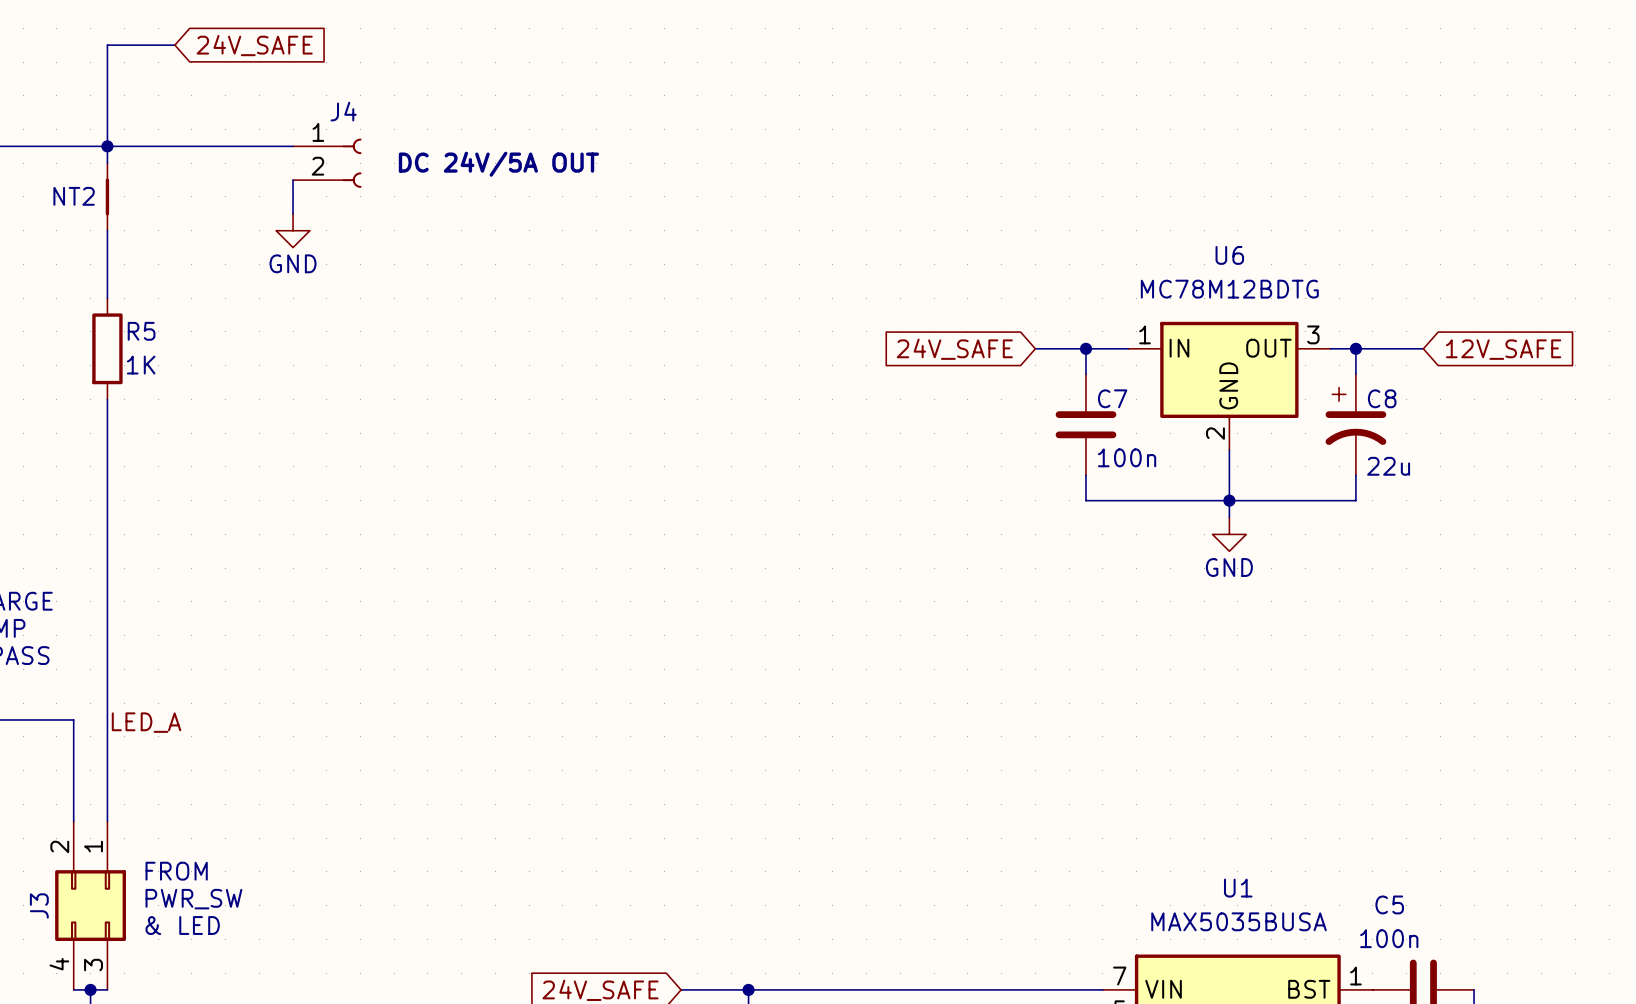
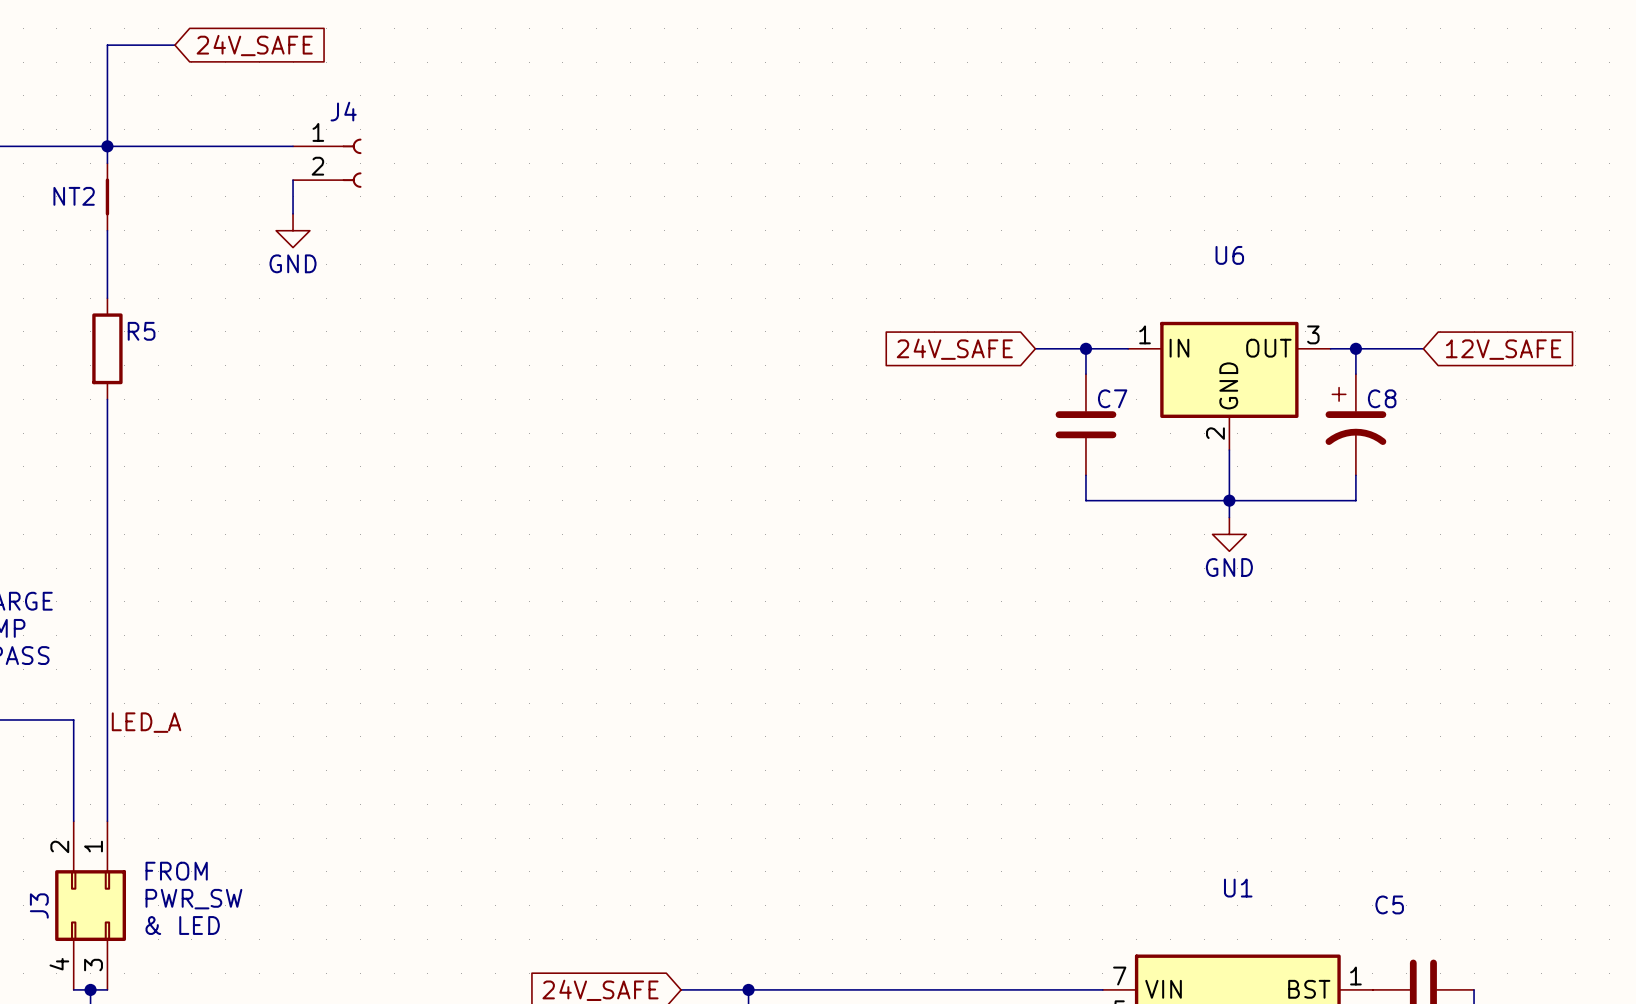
J4 value: DC 24V/5A OUT (498, 164) -> none
U6 value: MC78M12BDTG (1229, 289) -> none
R5 value: 1K (141, 365) -> none
C7 value: 100n (1127, 457) -> none
C8 value: 22u (1388, 466) -> none
U1 value: MAX5035BUSA (1239, 921) -> none
C5 value: 100n (1389, 938) -> none

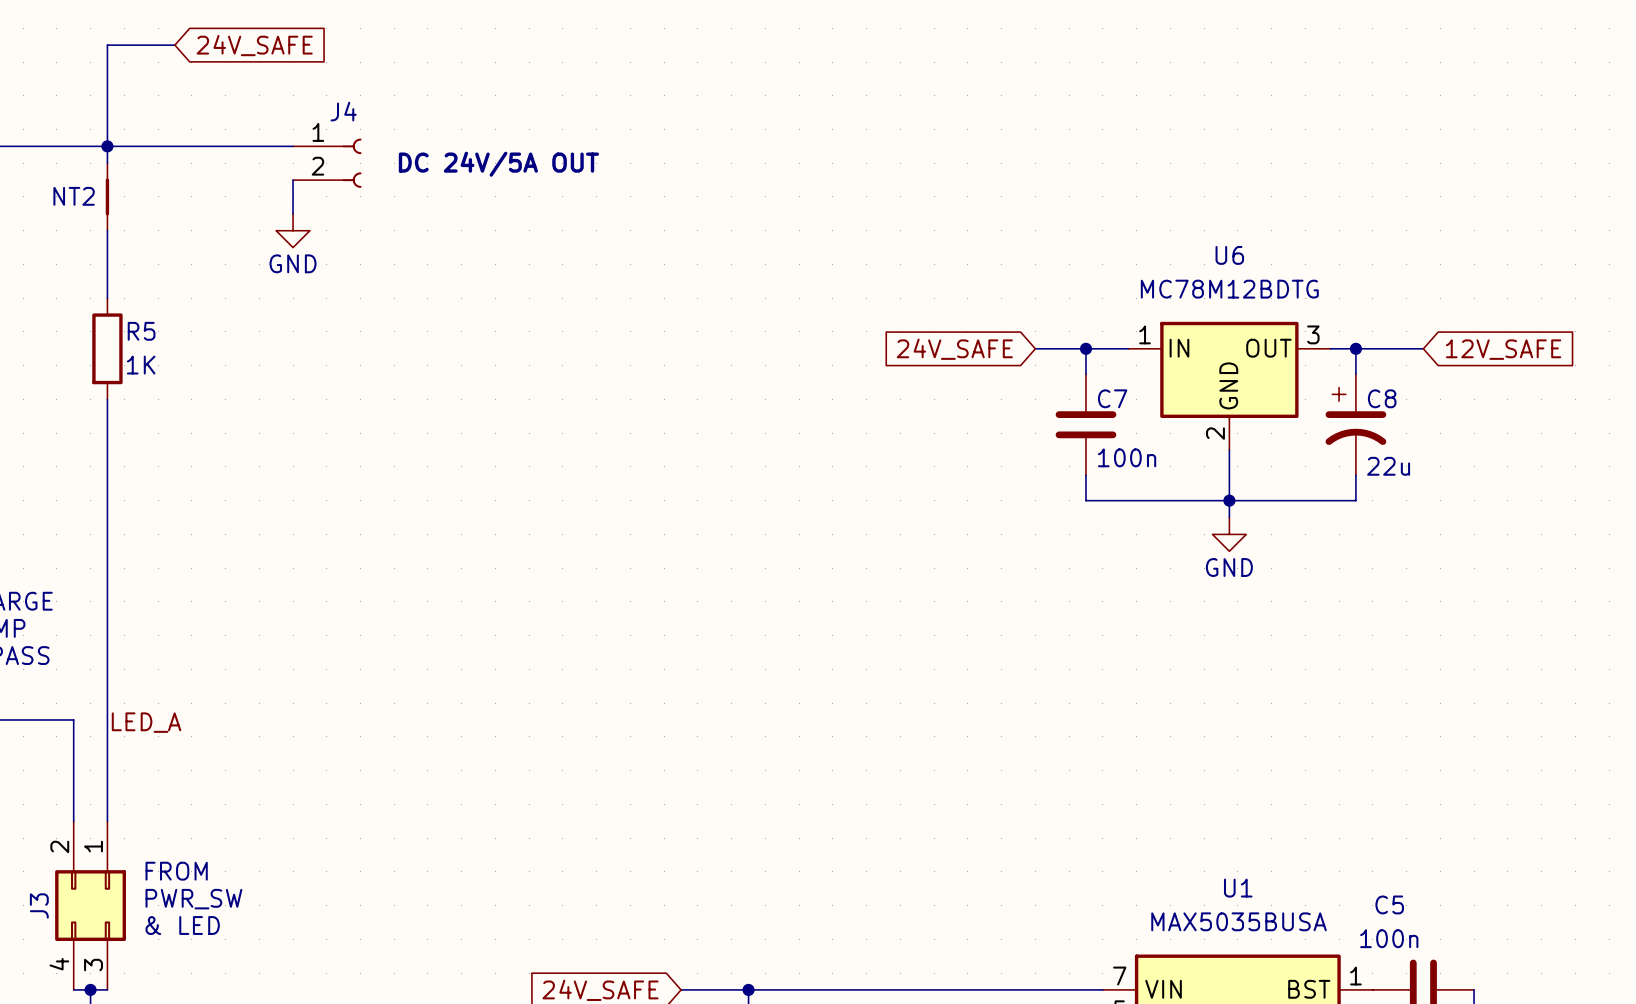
J4 value: none -> DC 24V/5A OUT (498, 164)
U6 value: none -> MC78M12BDTG (1229, 289)
R5 value: none -> 1K (141, 365)
C7 value: none -> 100n (1127, 457)
C8 value: none -> 22u (1388, 466)
U1 value: none -> MAX5035BUSA (1239, 921)
C5 value: none -> 100n (1389, 938)

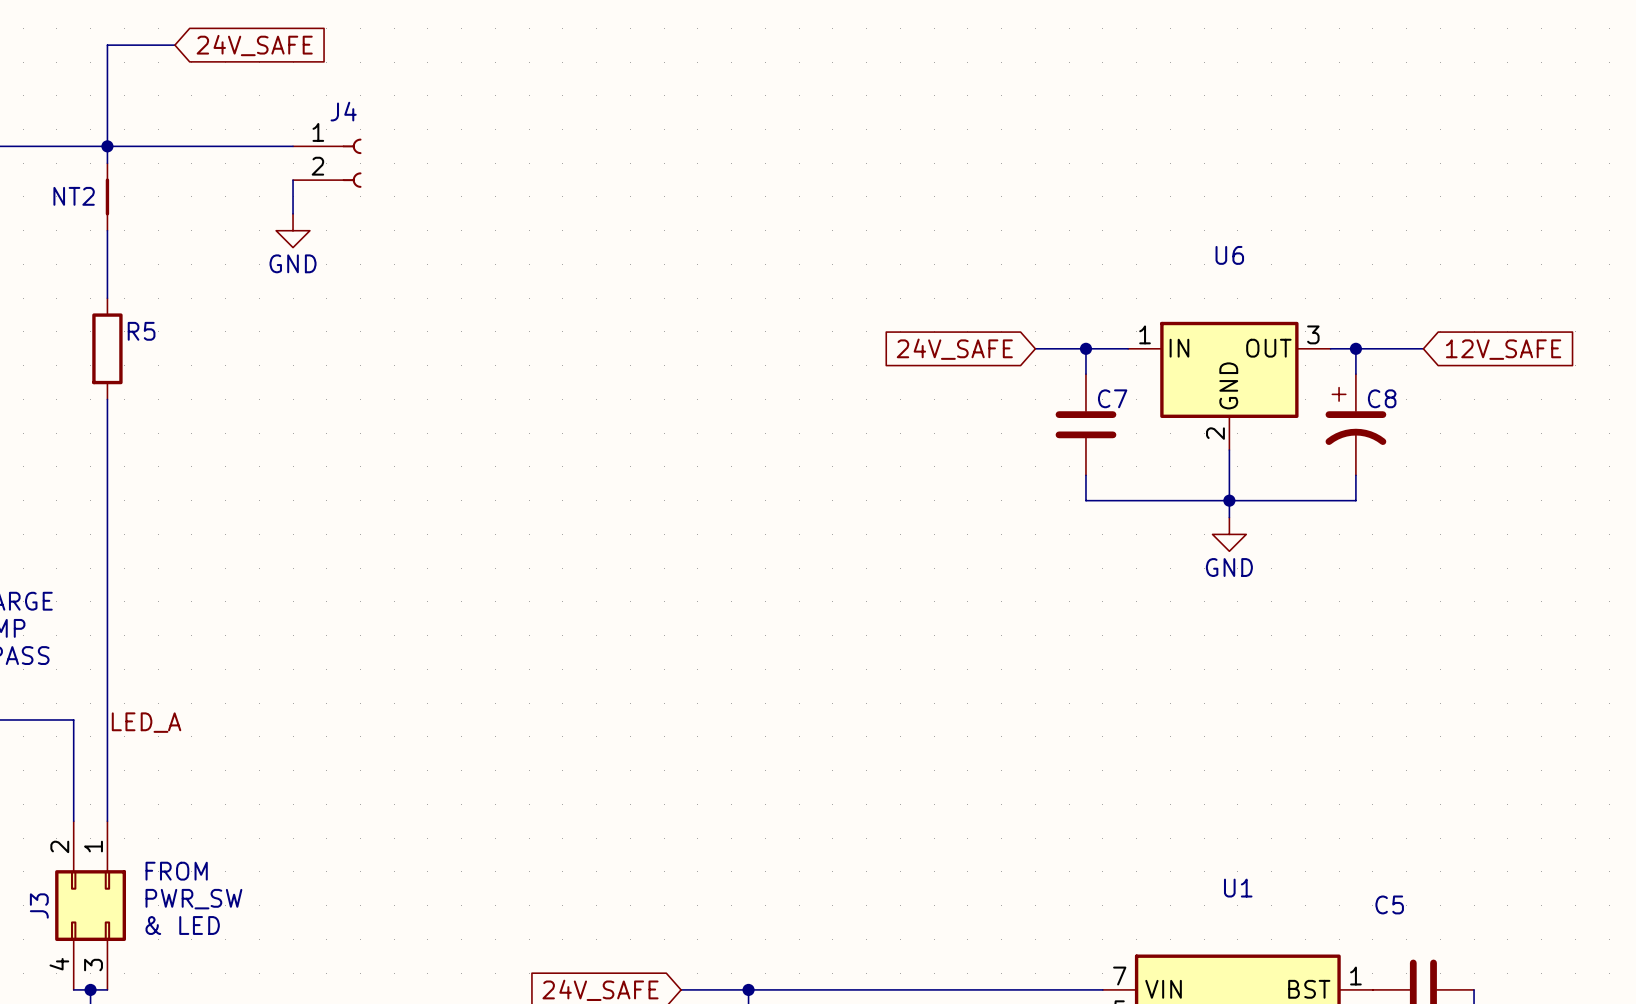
J4 value: DC 24V/5A OUT (498, 164) -> none
U6 value: MC78M12BDTG (1229, 289) -> none
R5 value: 1K (141, 365) -> none
C7 value: 100n (1127, 457) -> none
C8 value: 22u (1388, 466) -> none
U1 value: MAX5035BUSA (1239, 921) -> none
C5 value: 100n (1389, 938) -> none

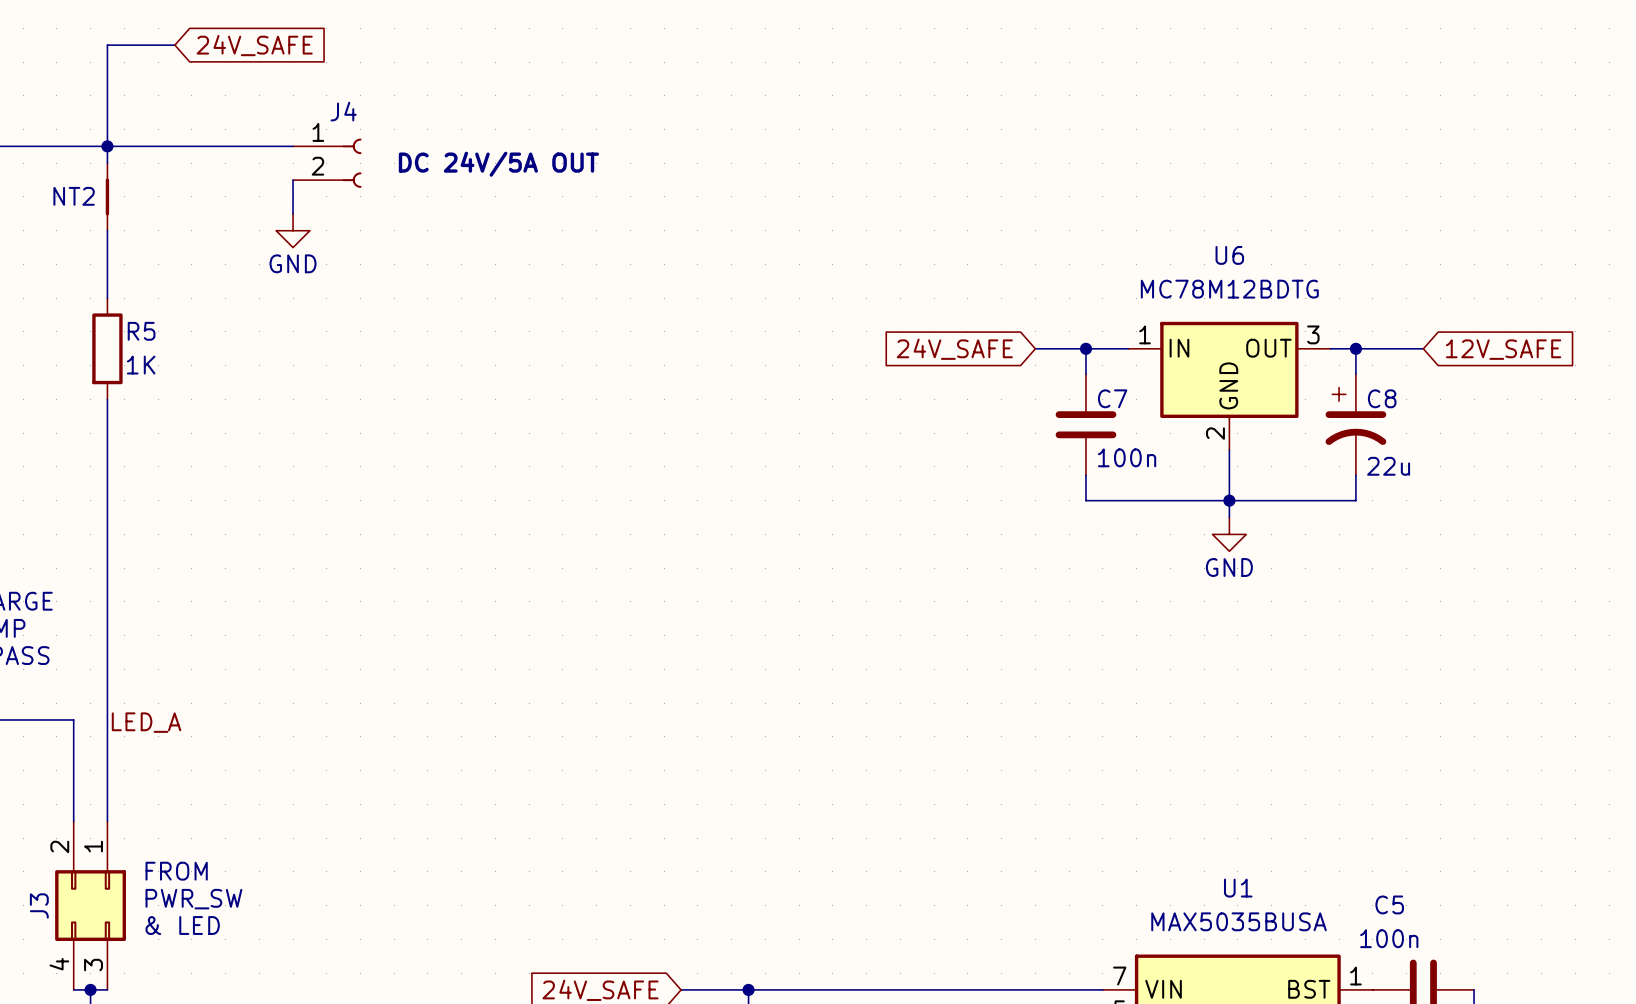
J4 value: none -> DC 24V/5A OUT (498, 164)
U6 value: none -> MC78M12BDTG (1229, 289)
R5 value: none -> 1K (141, 365)
C7 value: none -> 100n (1127, 457)
C8 value: none -> 22u (1388, 466)
U1 value: none -> MAX5035BUSA (1239, 921)
C5 value: none -> 100n (1389, 938)

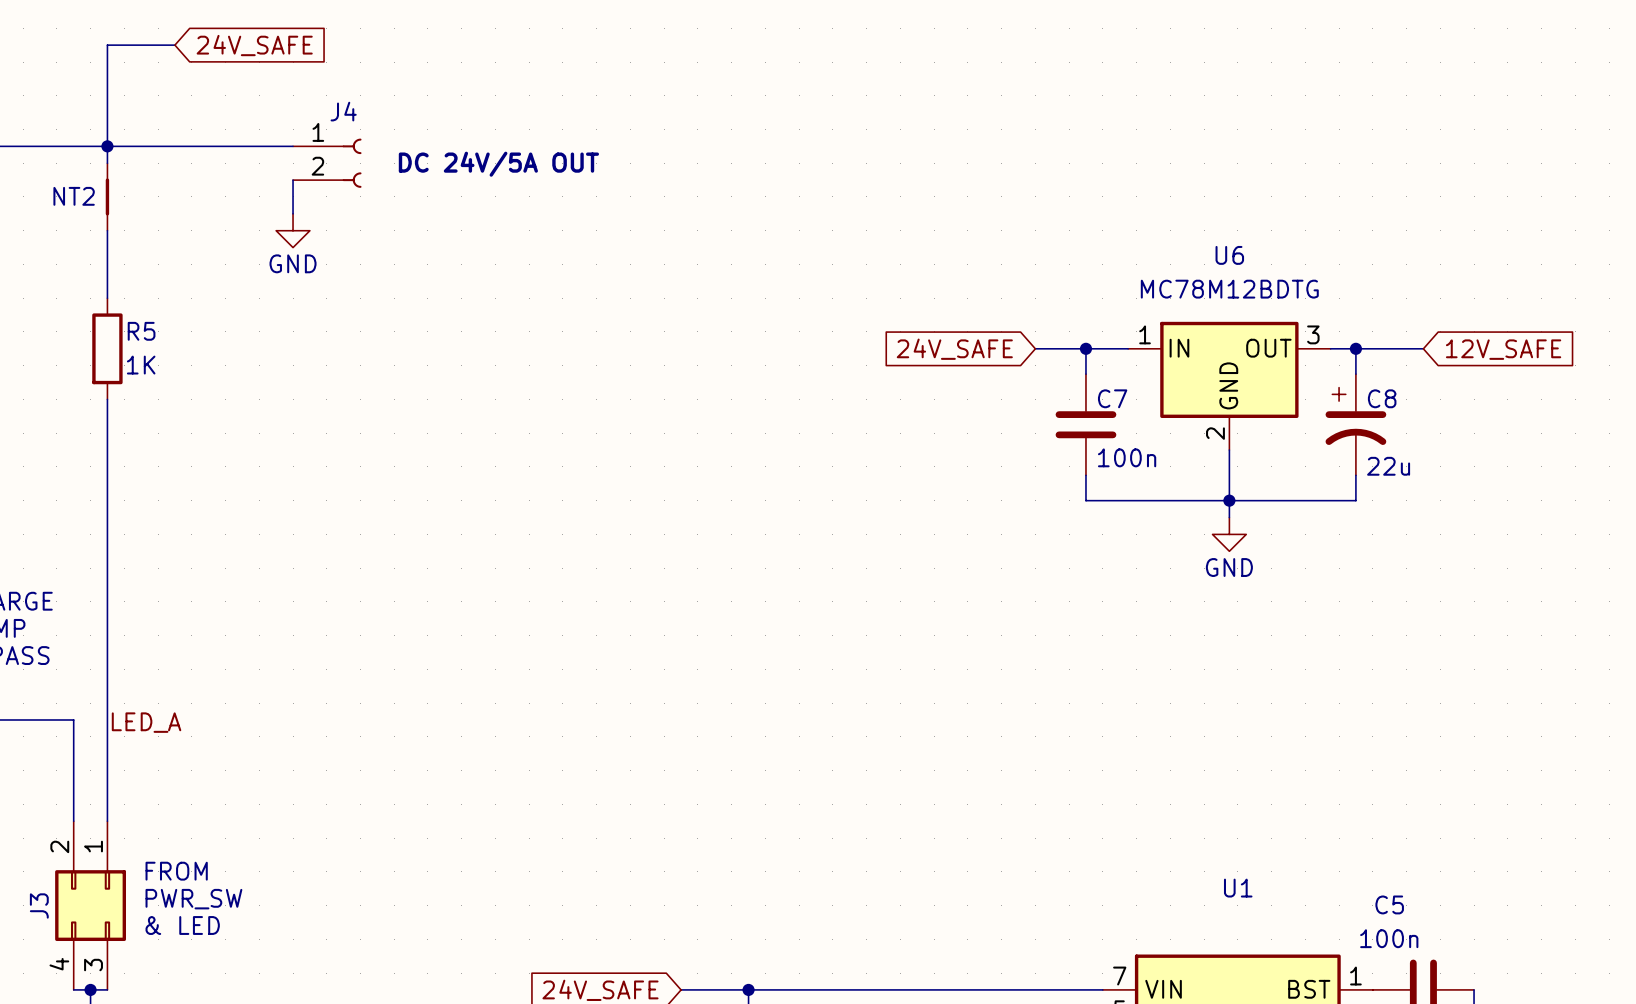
U1 value: MAX5035BUSA (1239, 921) -> none

